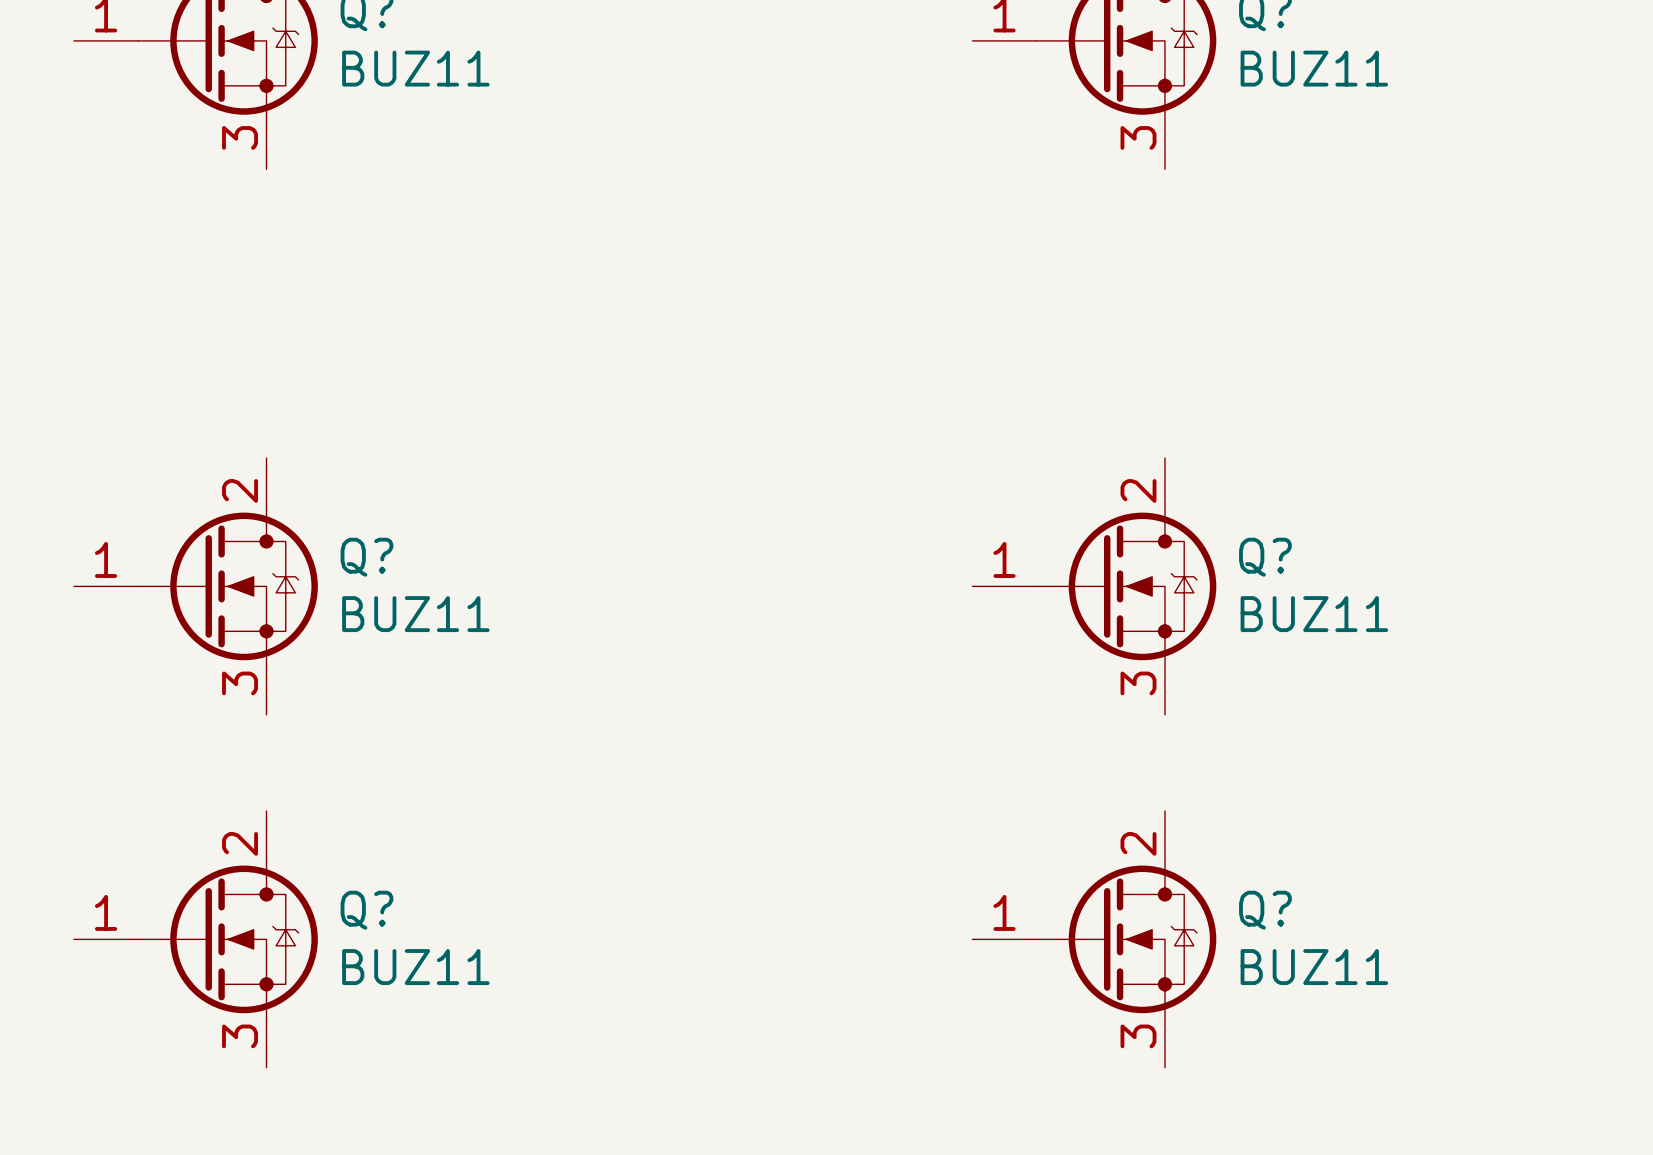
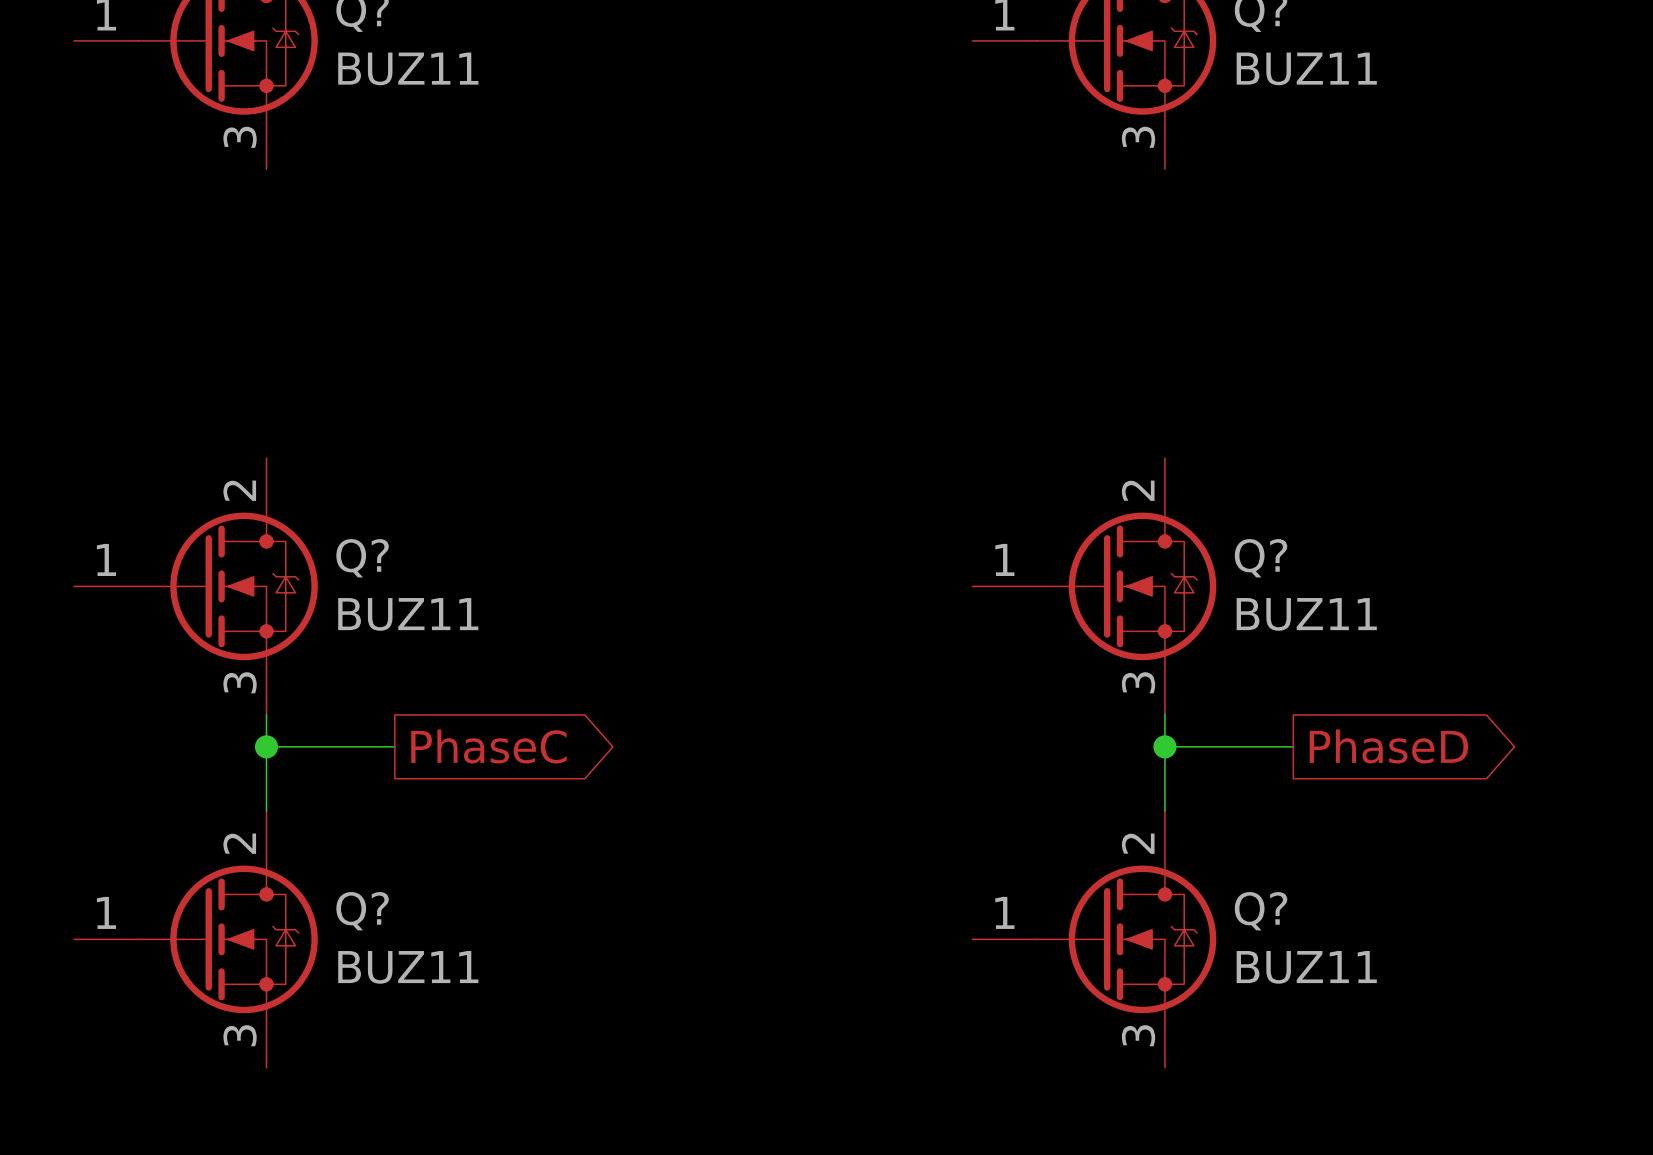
wire: none -> (266, 714) (266, 811)
wire: none -> (1164, 714) (1164, 811)
wire: none -> (266, 746) (394, 746)
junction: none -> (266, 746)
global label: none -> PhaseC (488, 746)
wire: none -> (1164, 746) (1293, 746)
junction: none -> (1164, 746)
global label: none -> PhaseD (1388, 746)

